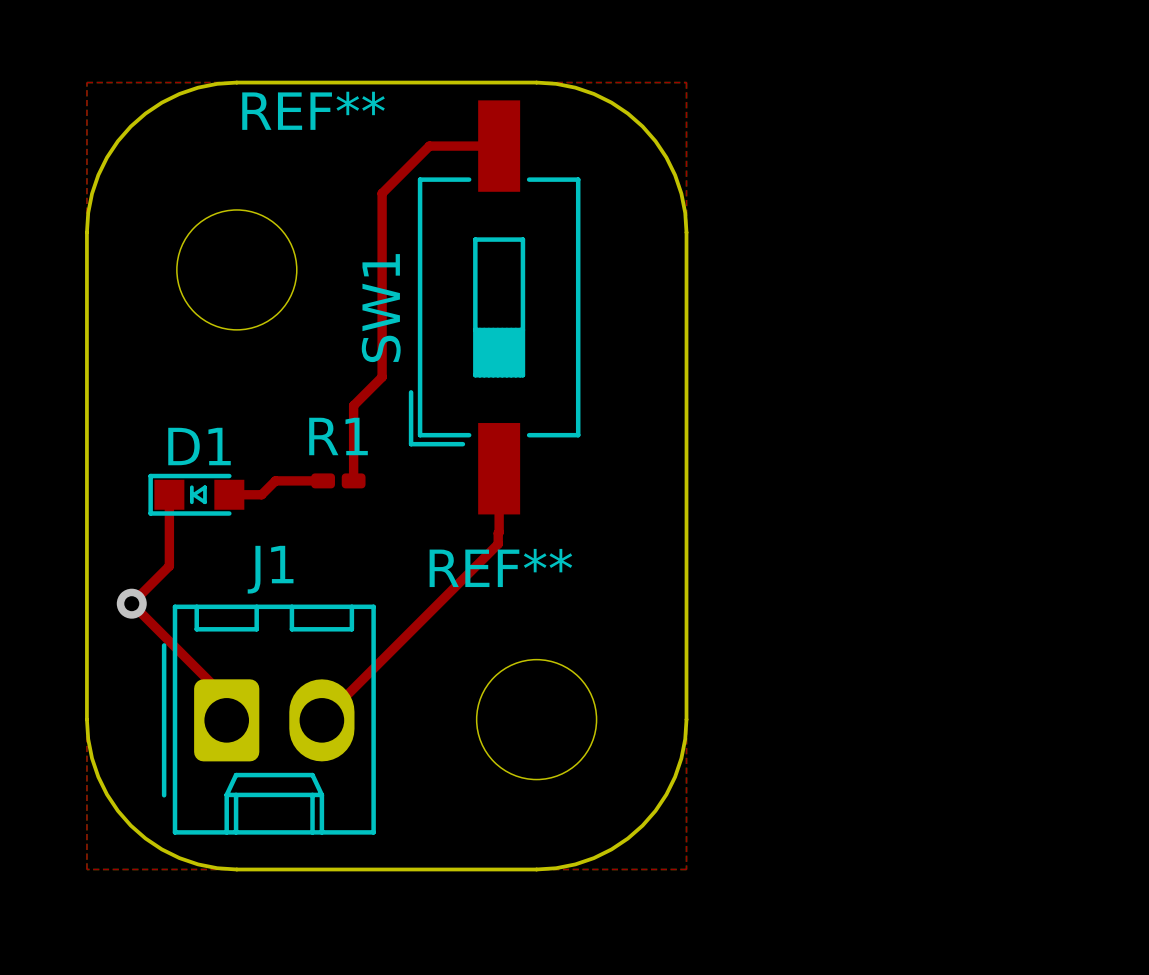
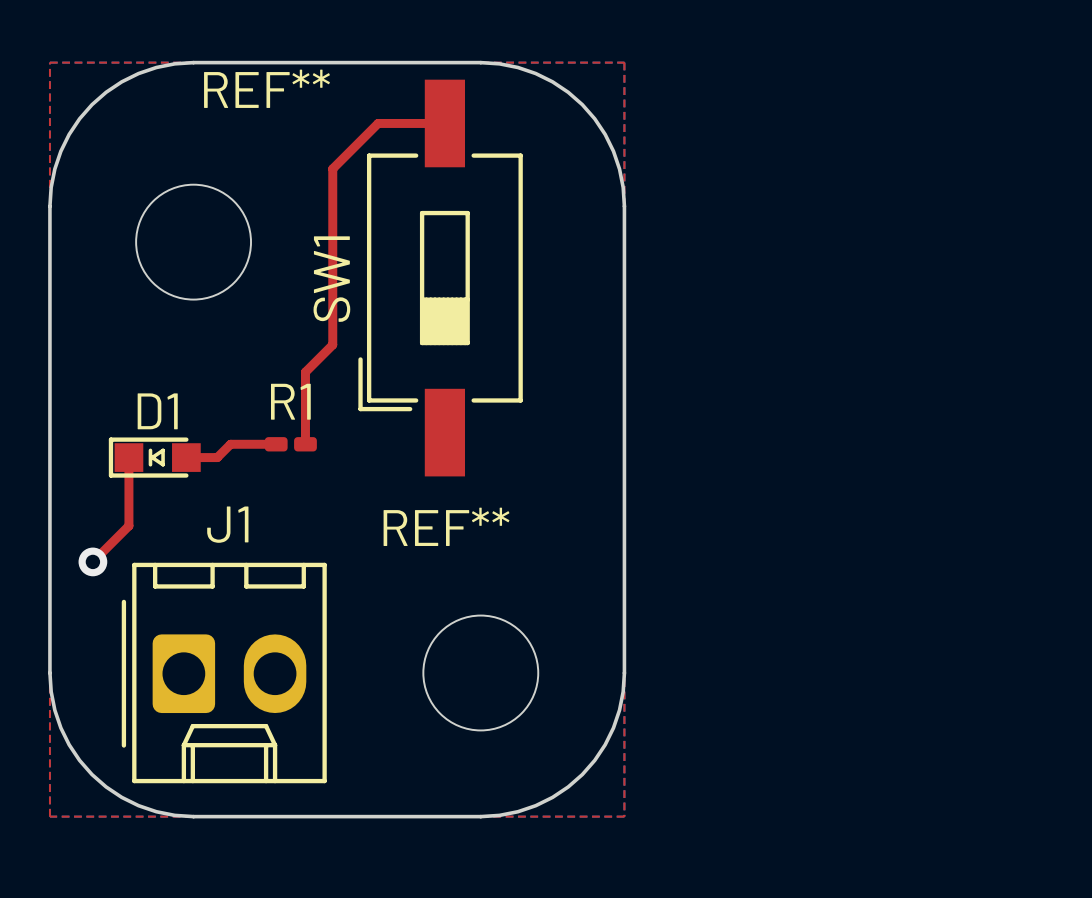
top track: (499, 468) (498, 544) (321, 720) -> none
top track: (131, 603) (226, 698) (226, 720) -> none

